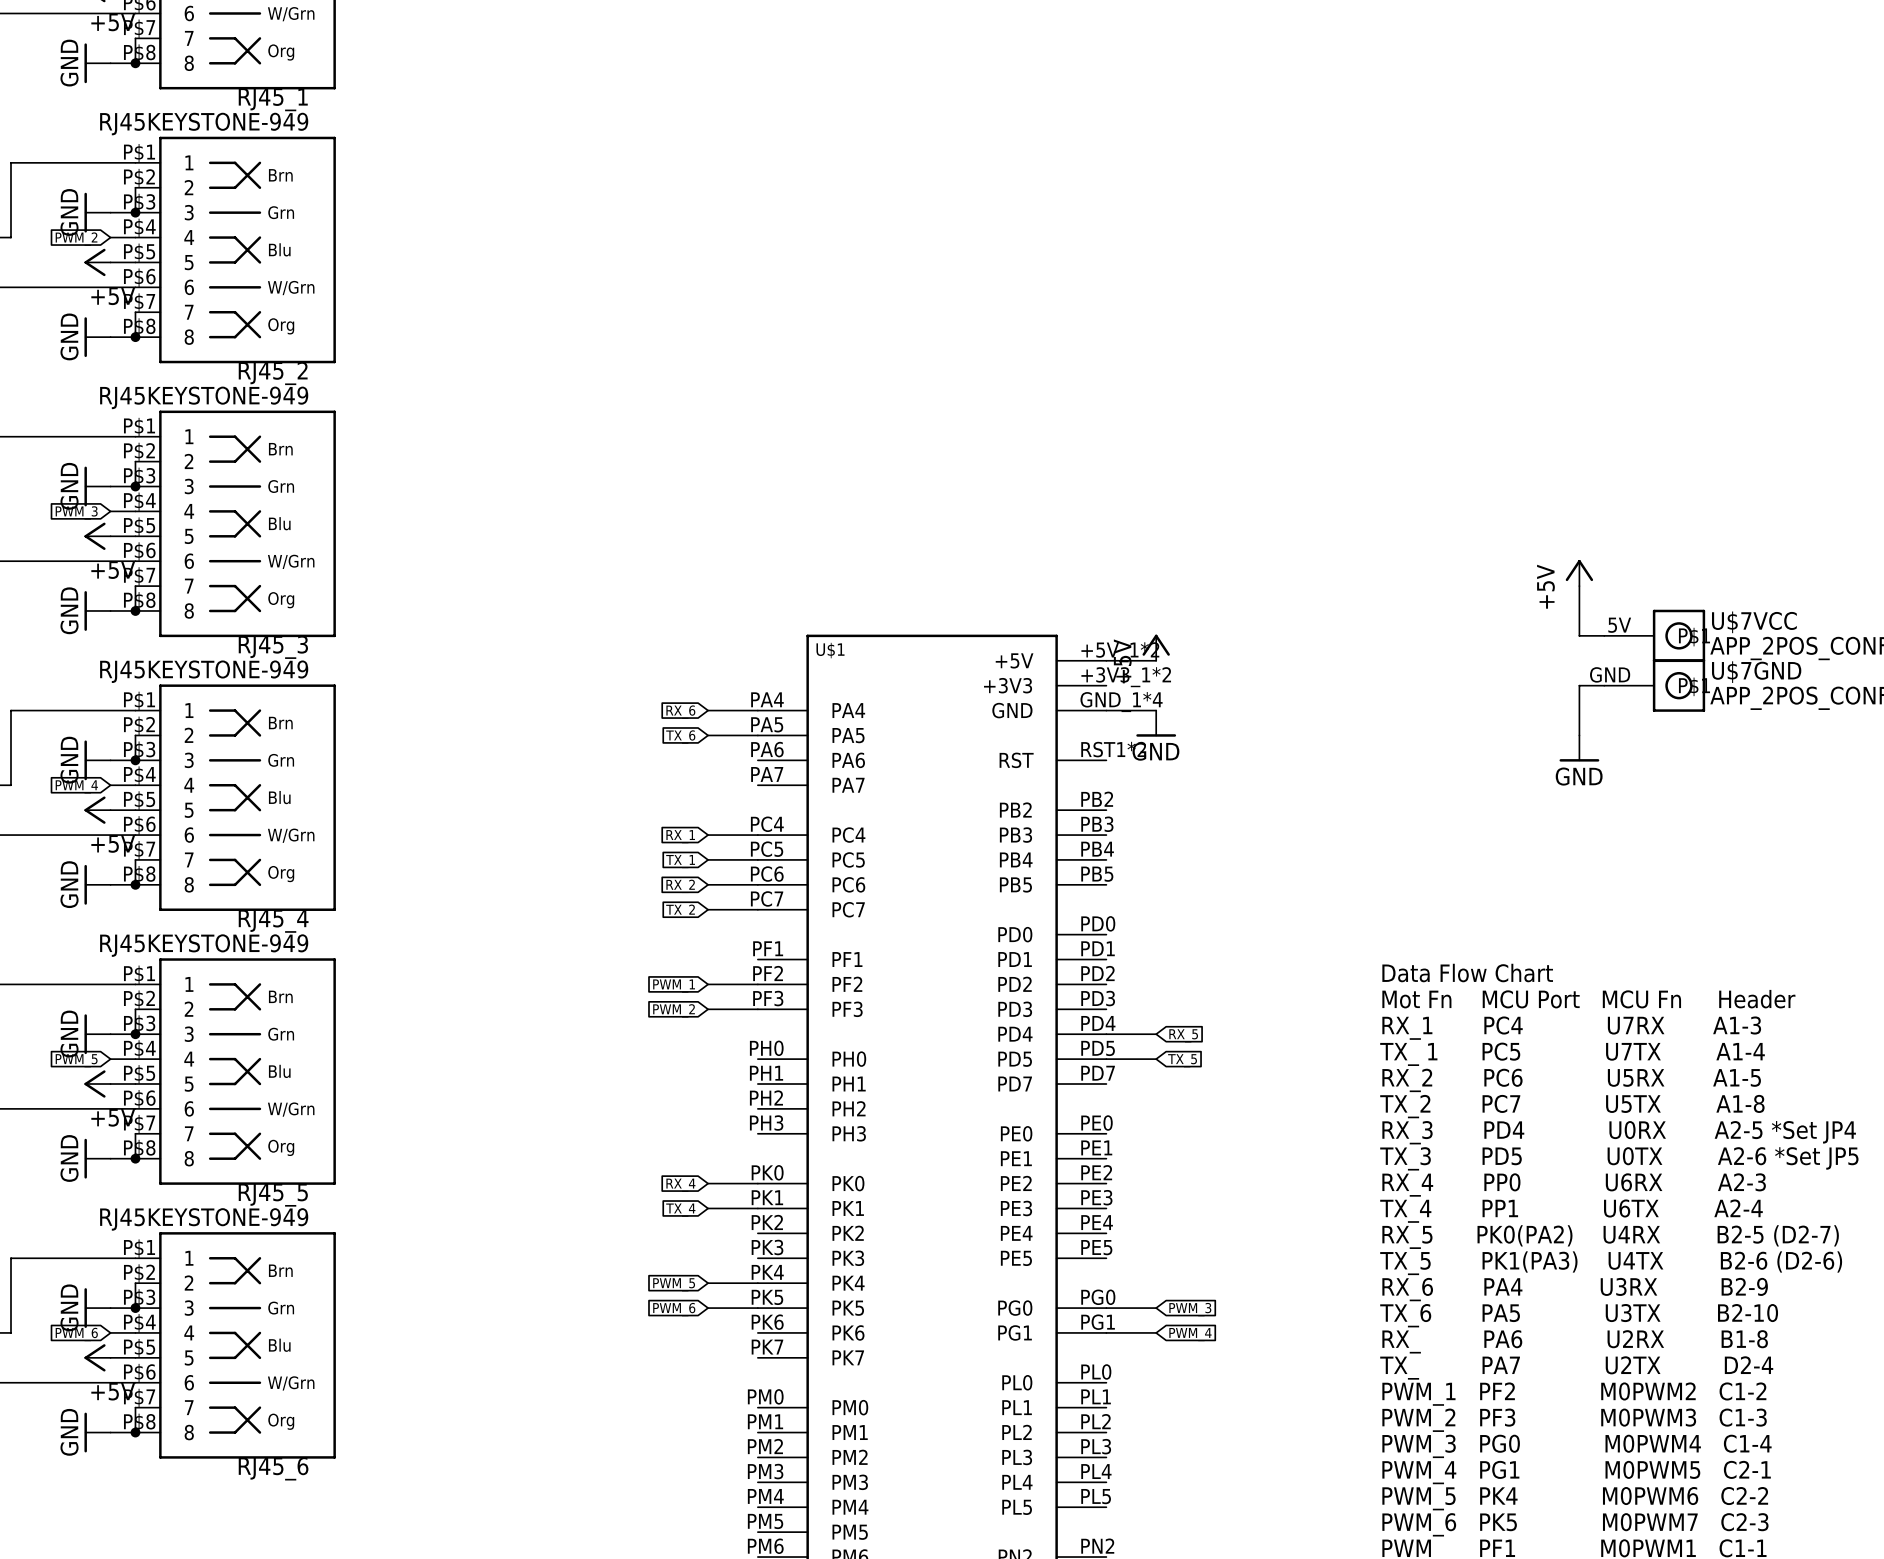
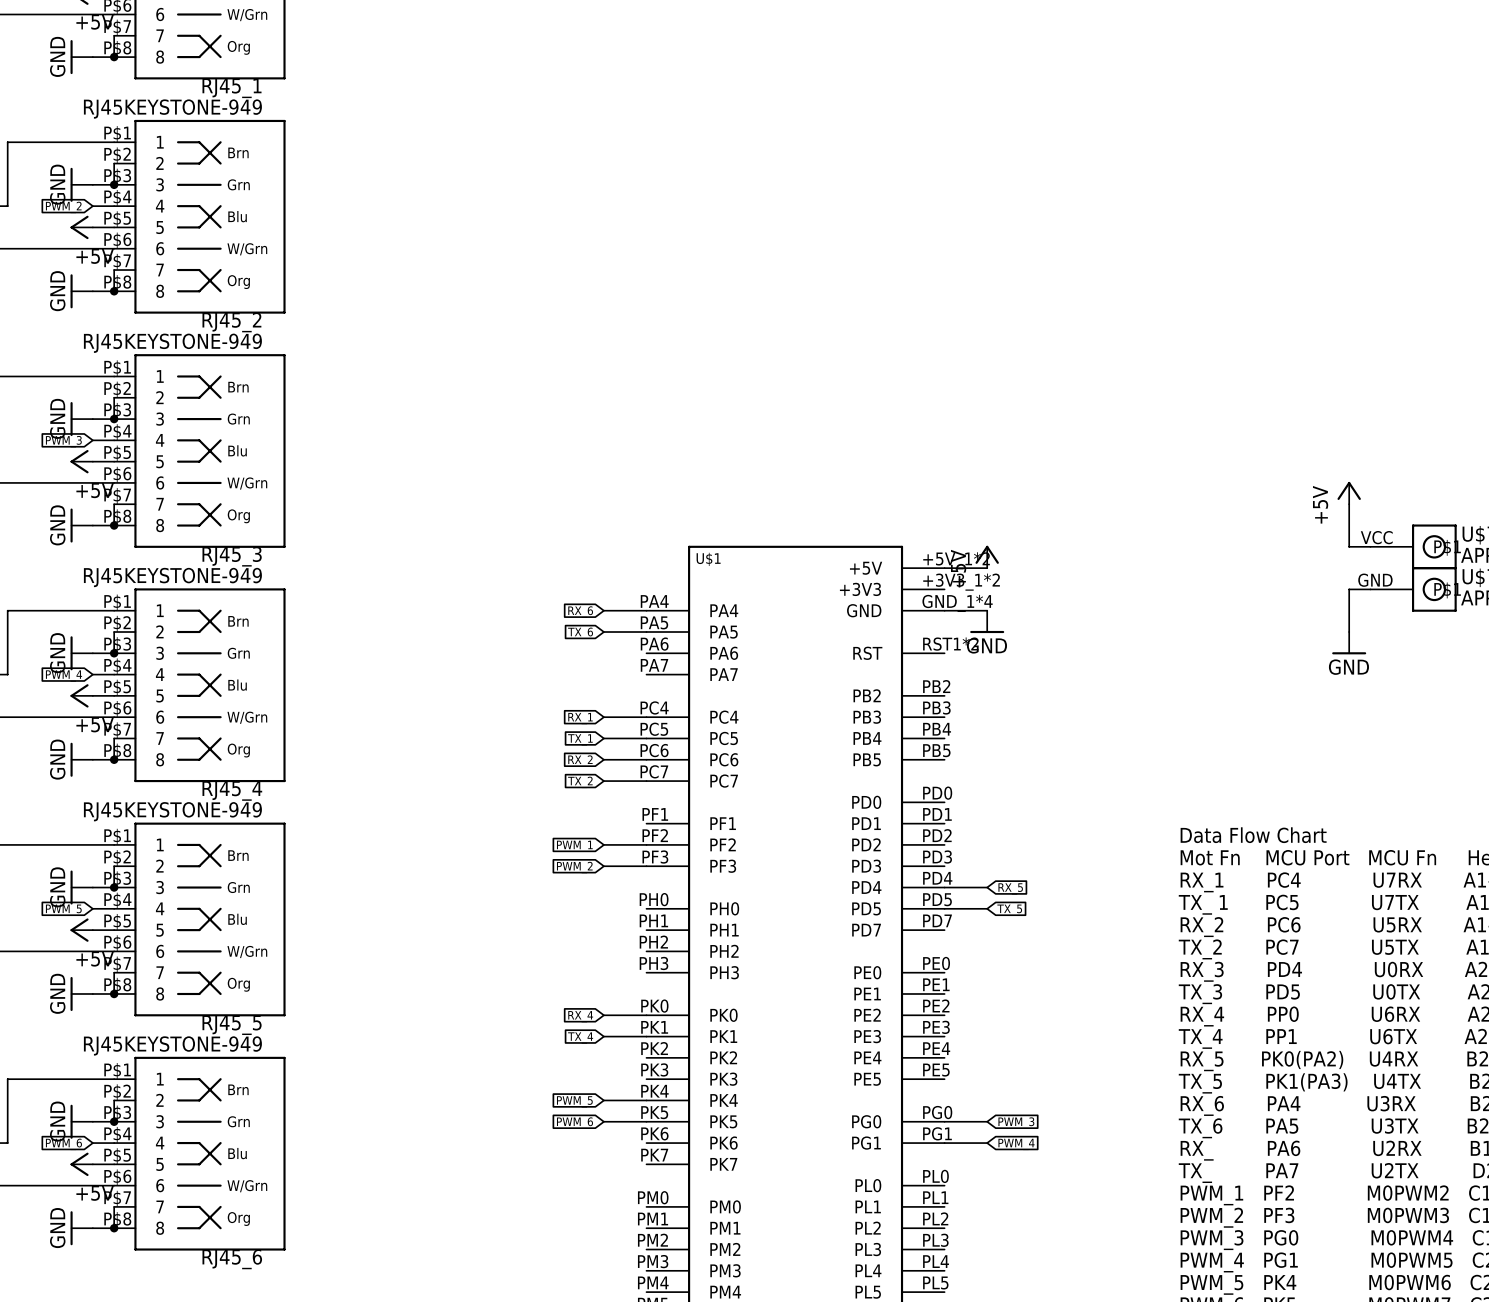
U$7VCC pin number: 5V (1619, 625) -> VCC (1376, 537)

